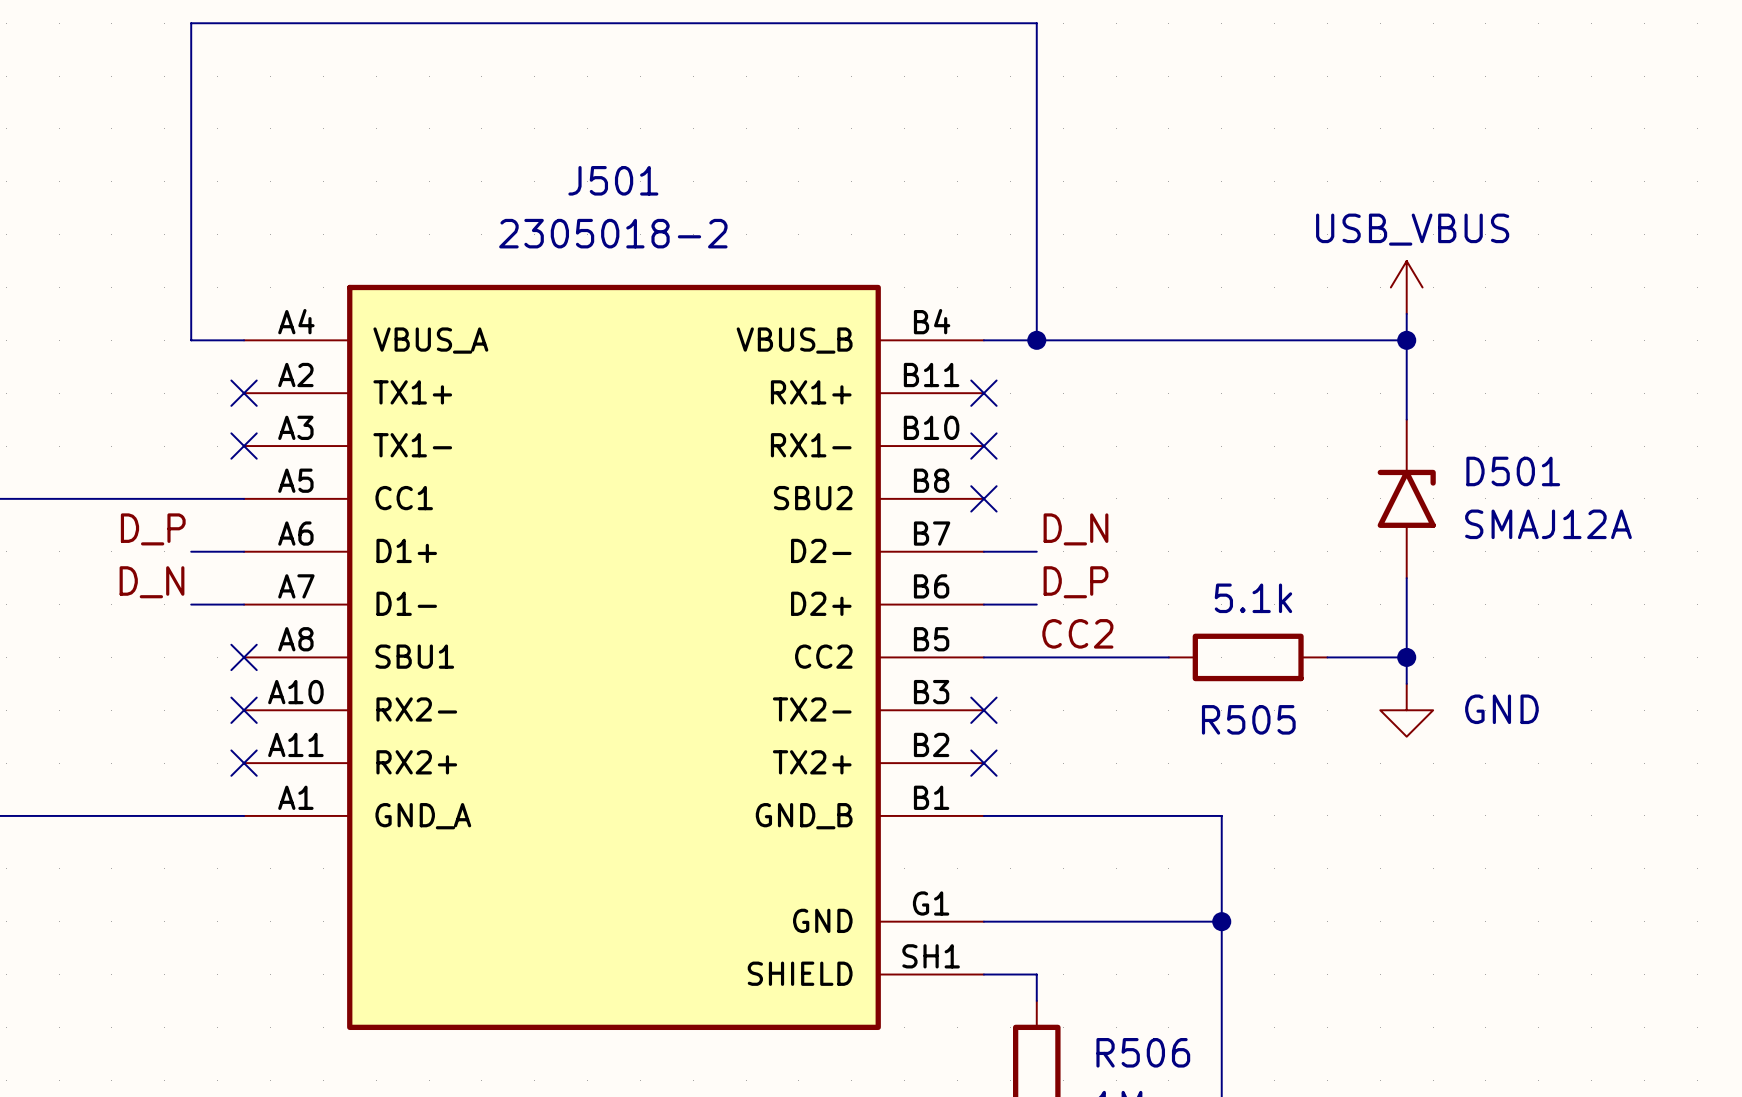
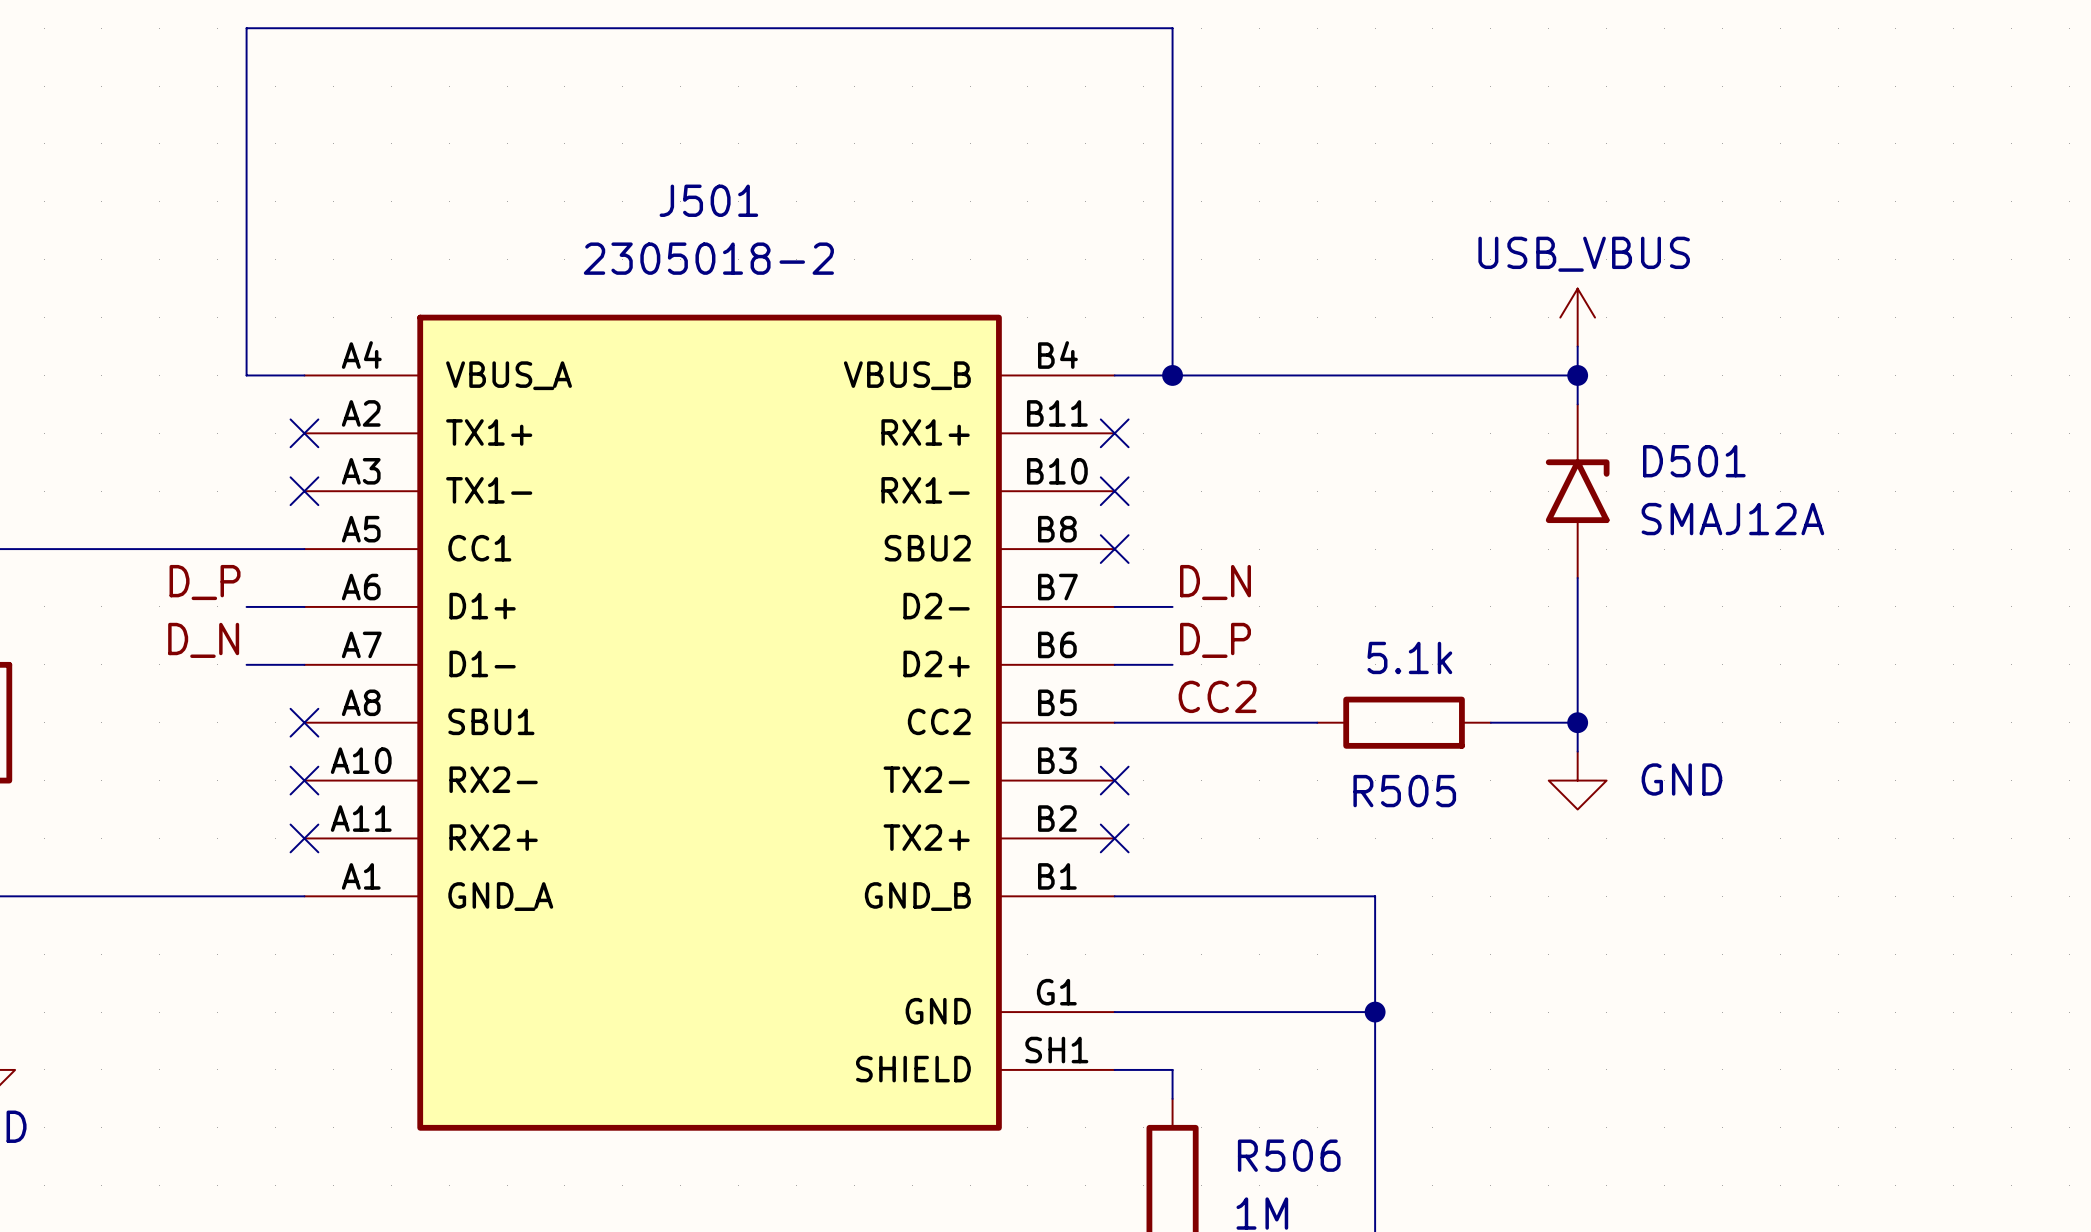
D501 position: (1406, 498) -> (1577, 491)

